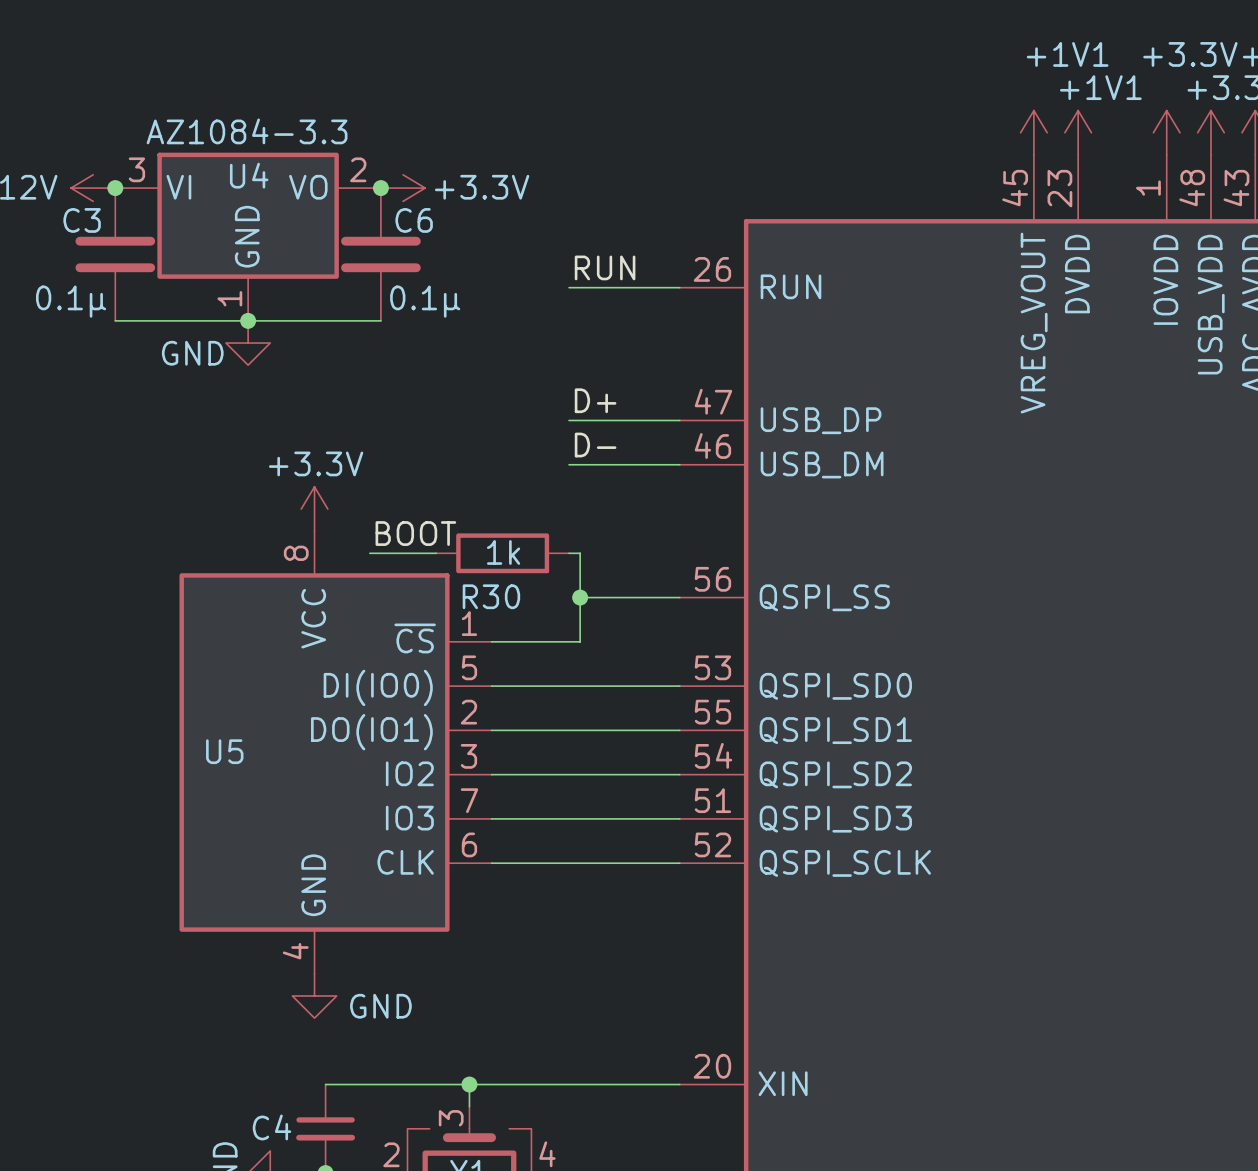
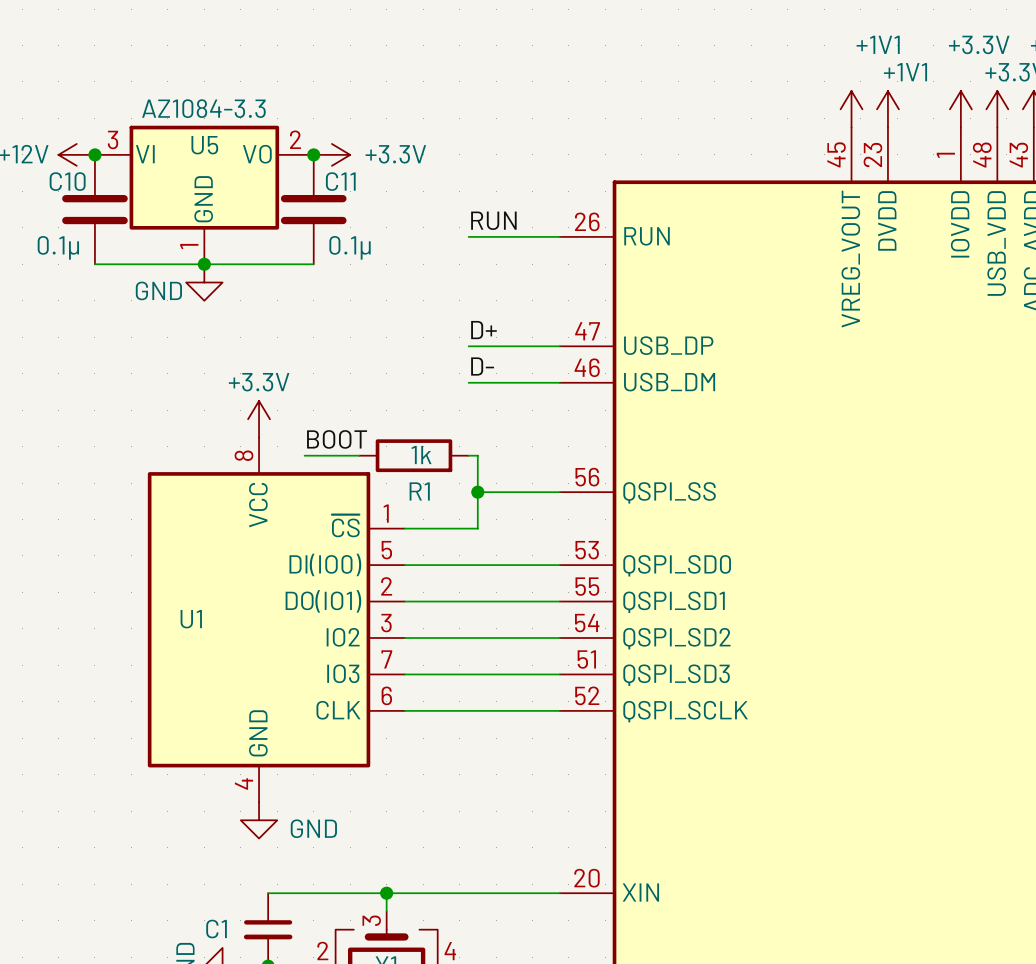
U4 name: U4 (249, 175) -> U5 (204, 145)
C3 name: C3 (82, 220) -> C10 (67, 181)
C6 name: C6 (414, 220) -> C11 (340, 181)
R30 name: R30 (491, 596) -> R1 (419, 491)
U5 name: U5 (224, 751) -> U1 (191, 619)
C4 name: C4 (272, 1127) -> C1 (216, 929)

